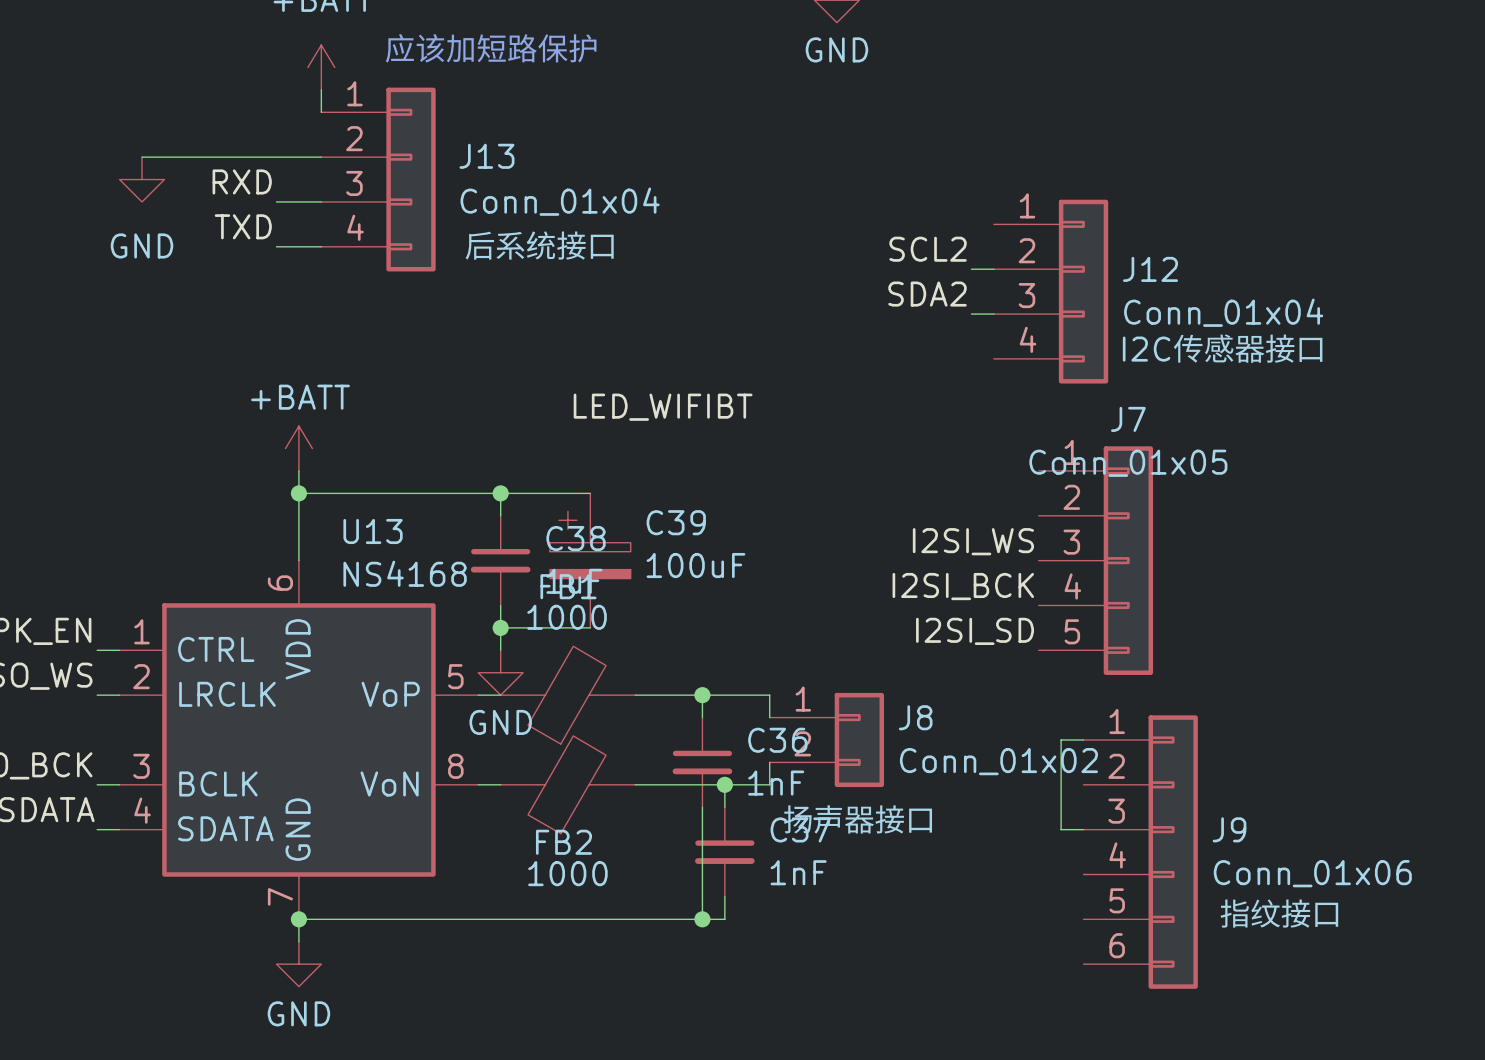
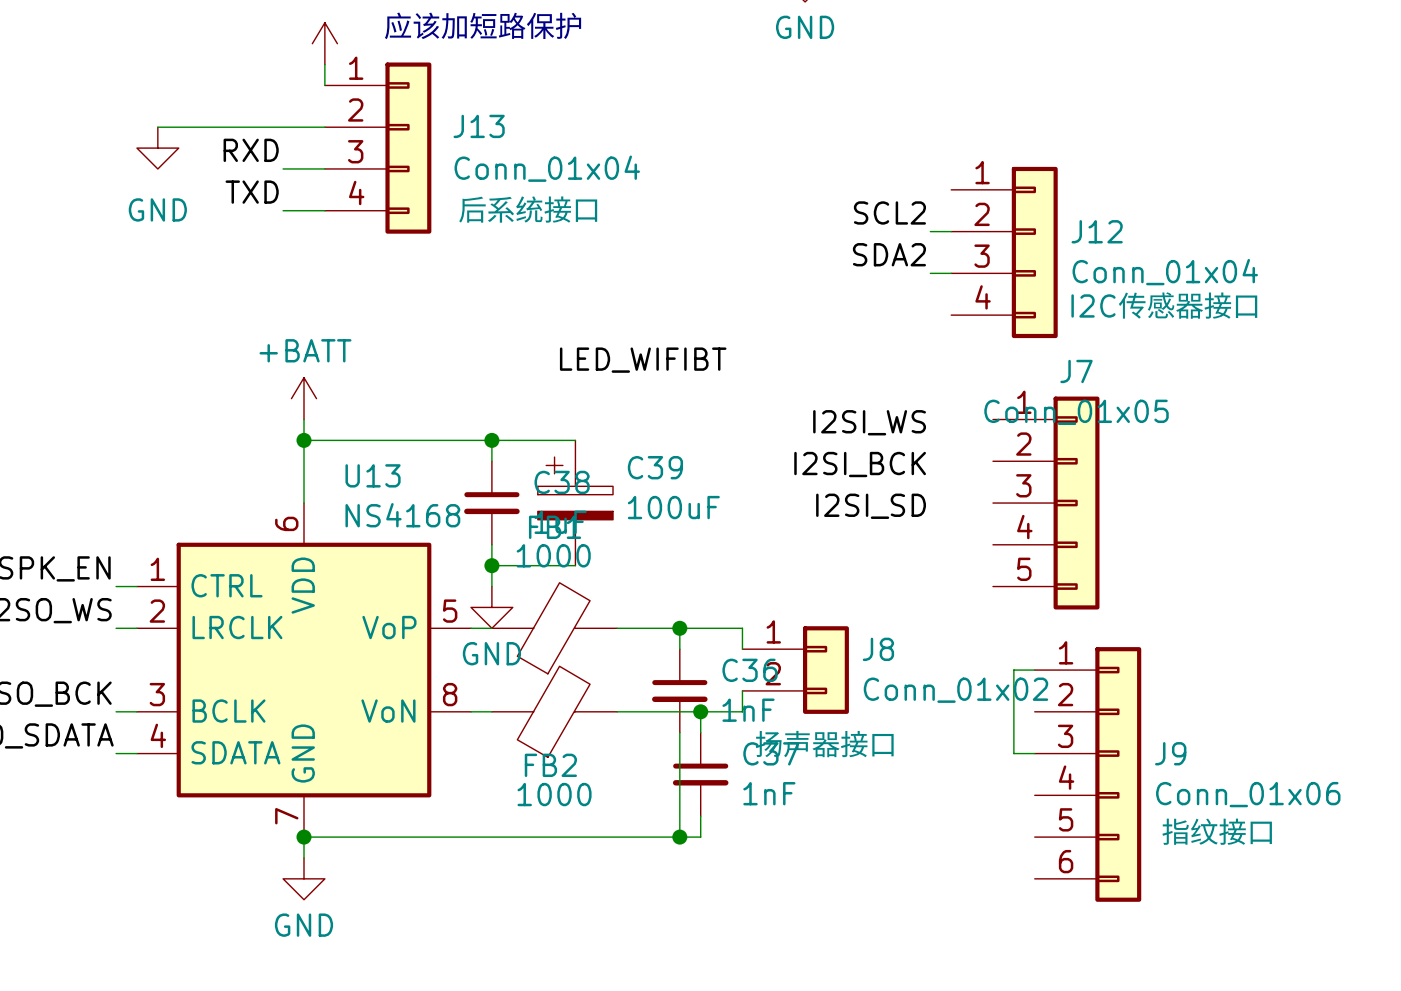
label position: I2SI_WS (973, 541) -> I2SI_WS (869, 422)
label position: I2SI_BCK (963, 586) -> I2SI_BCK (860, 464)
label position: I2SI_SD (975, 631) -> I2SI_SD (871, 506)

